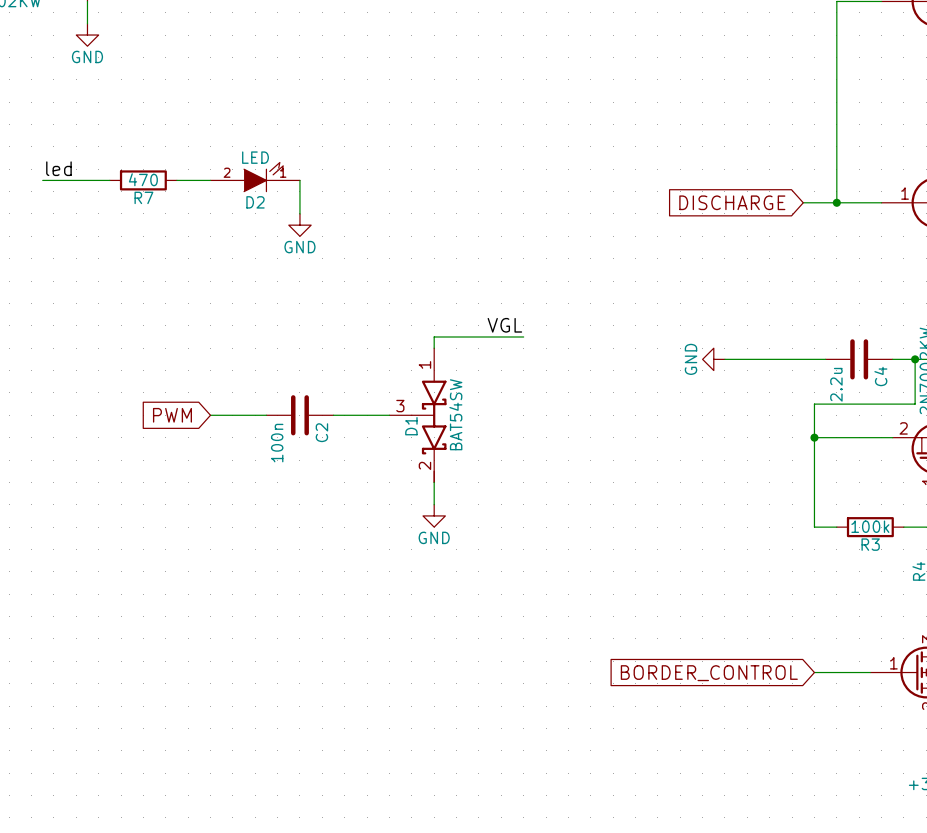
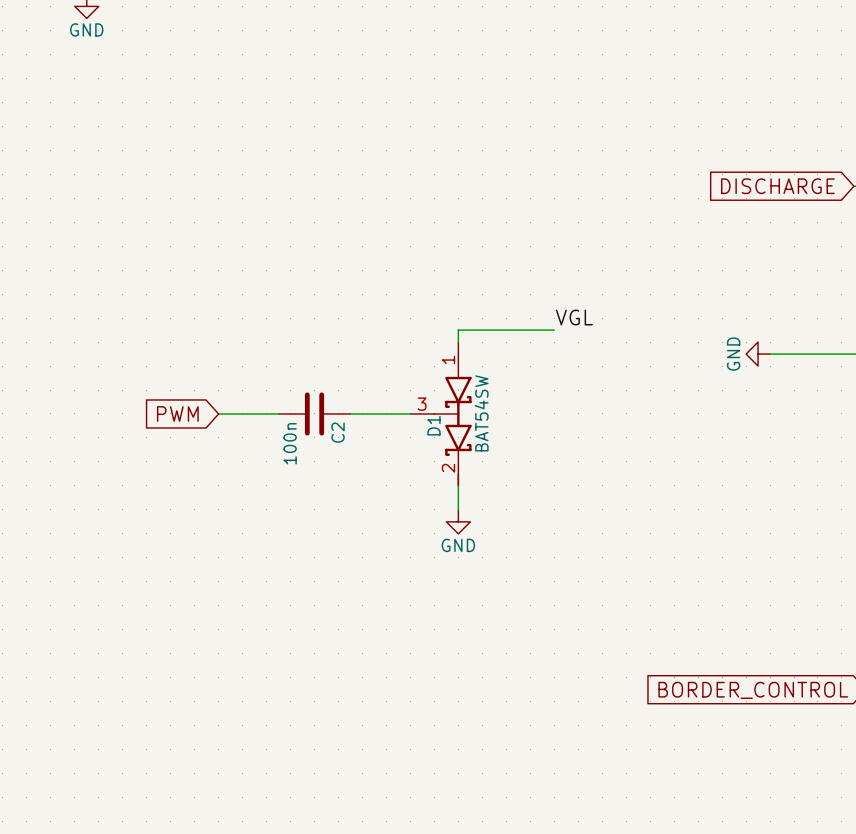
label: led (58, 168) -> none
D2: LED (255, 177) -> none
wire: (42, 180) (109, 180) -> none
R7: 470 (143, 180) -> none
wire: (176, 180) (210, 180) -> none
wire: (299, 180) (299, 213) -> none
power symbol: GND (299, 225) -> none
label position: VGL (504, 325) -> VGL (574, 317)

